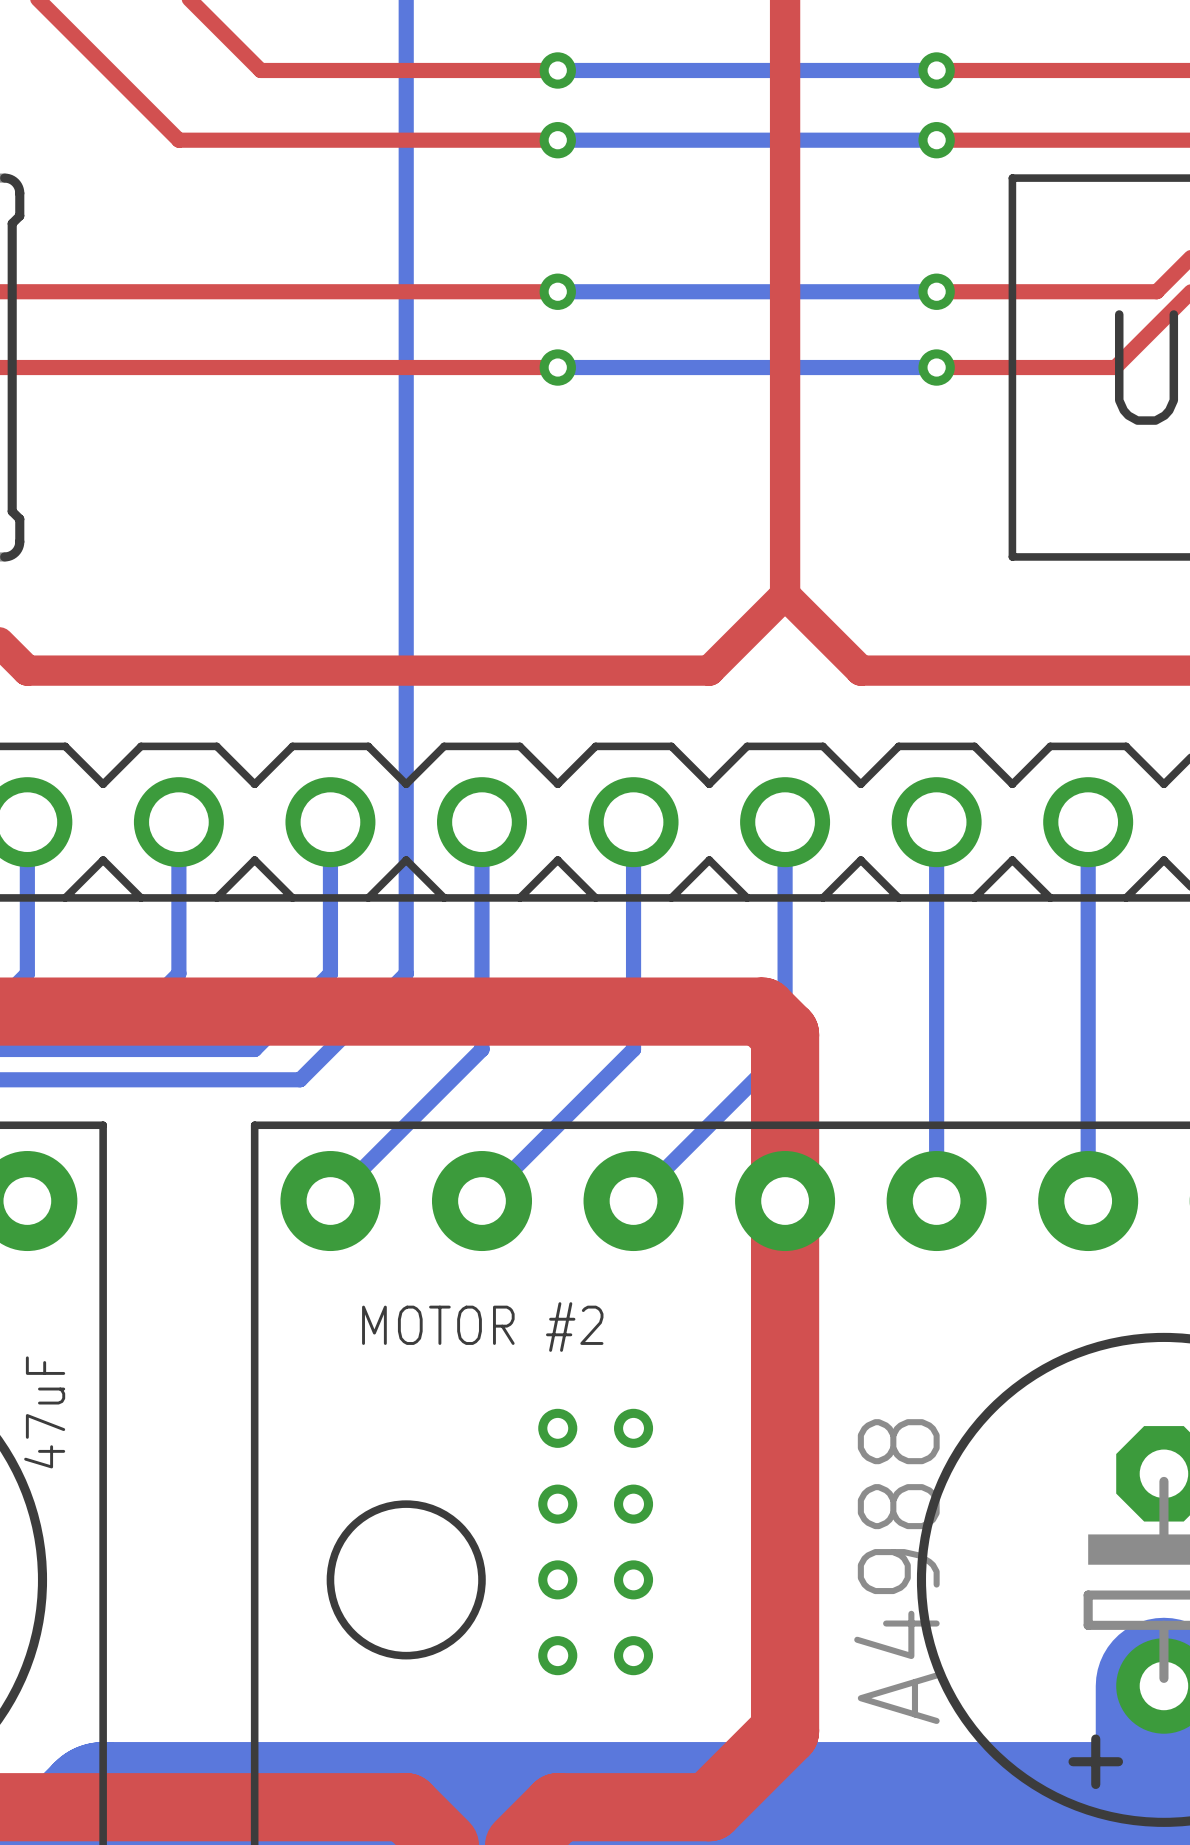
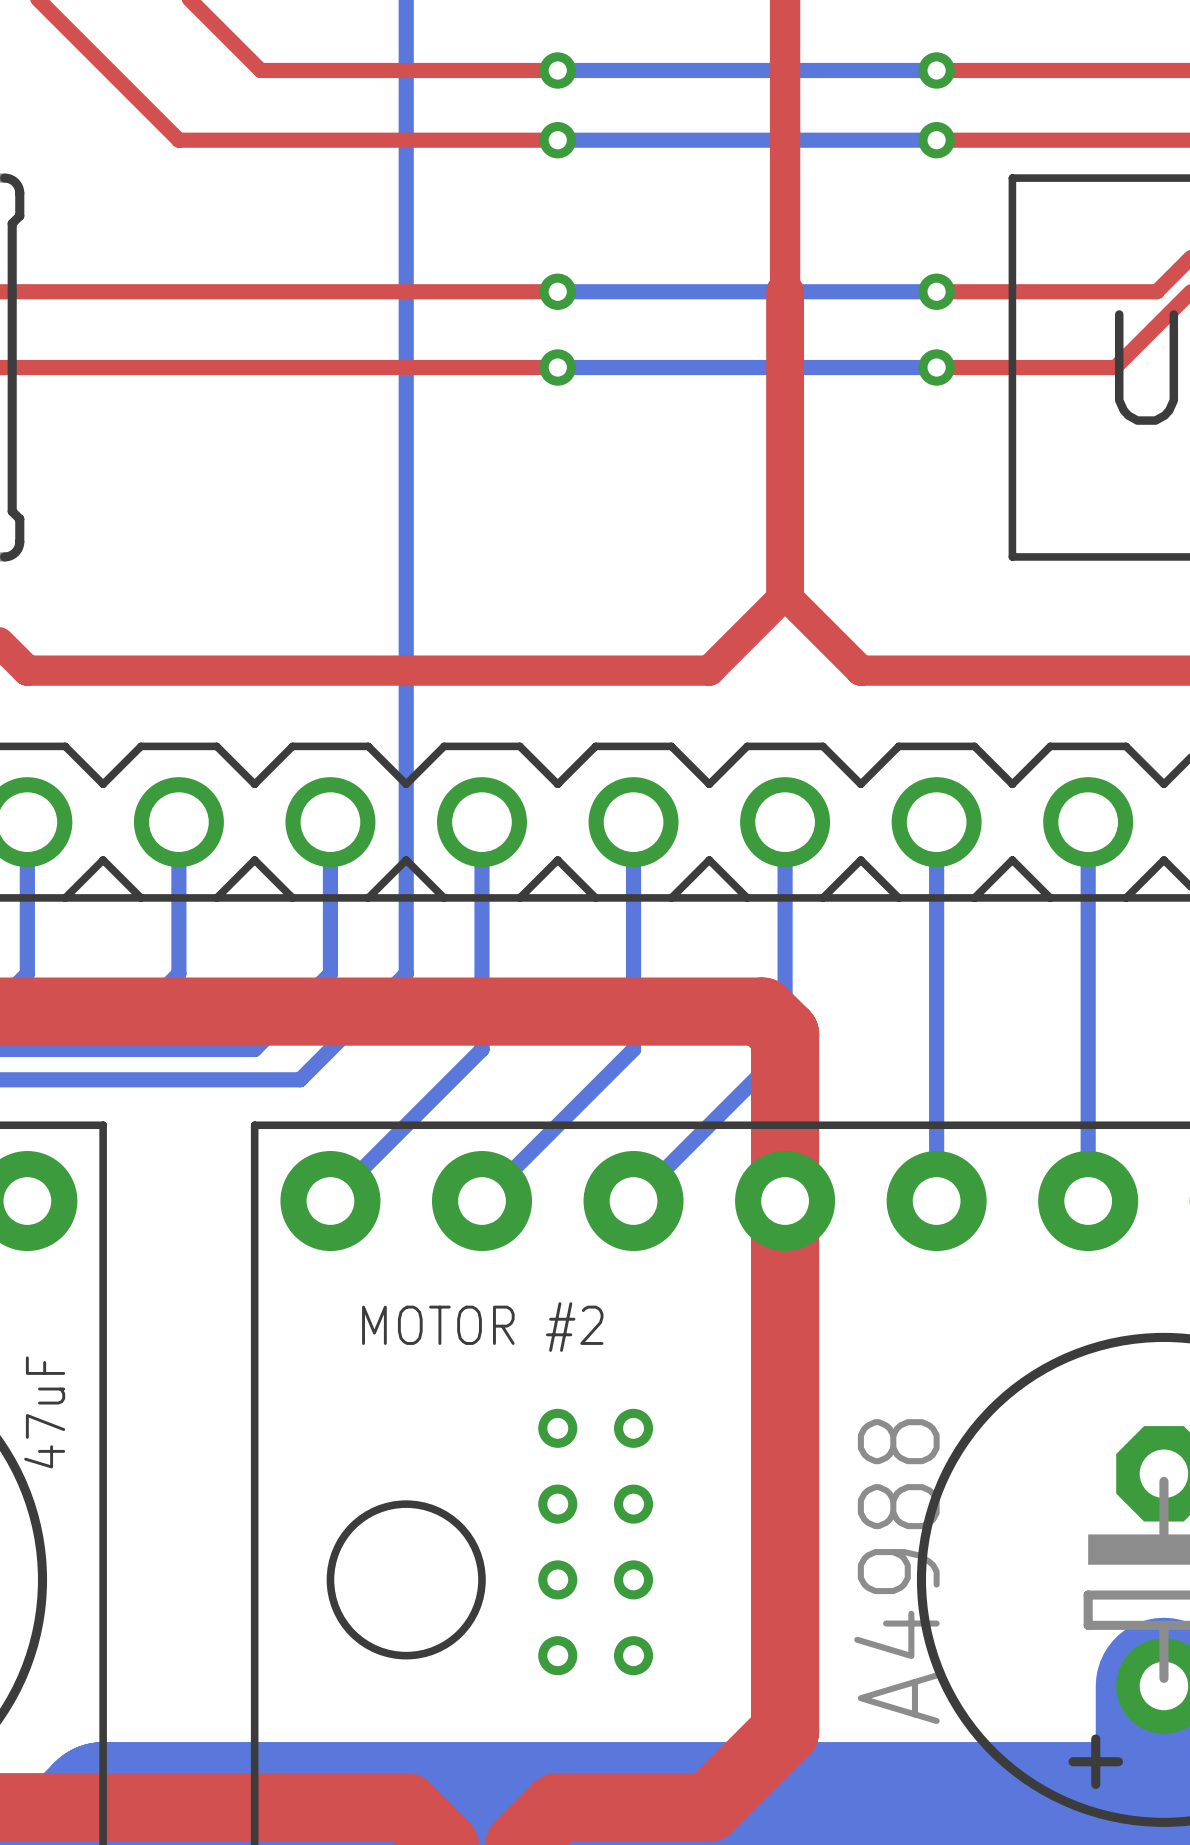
top track width: thin (785, 291) (785, 594) -> thick (785, 291) (785, 594)

